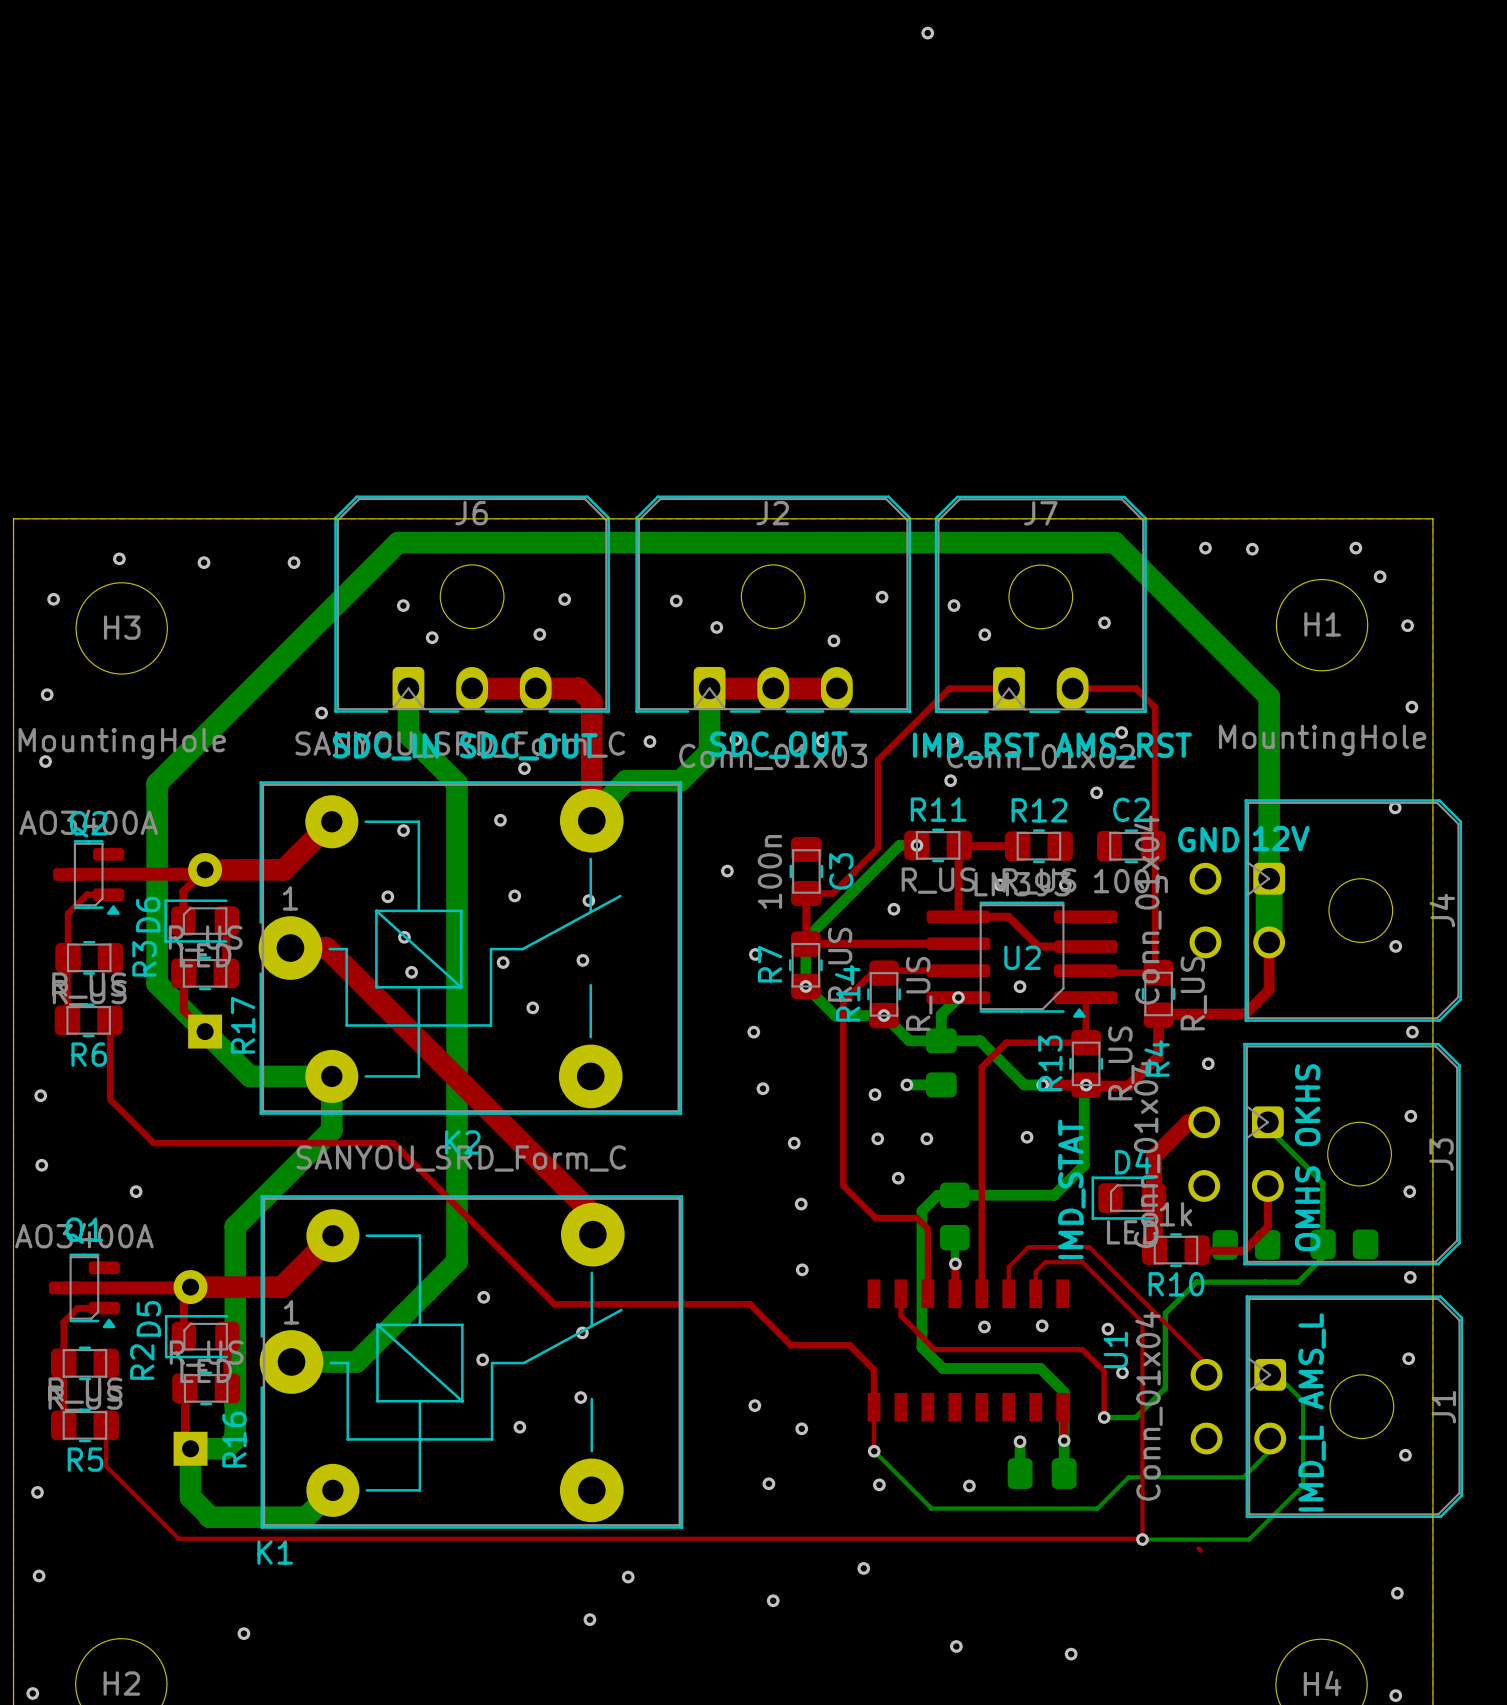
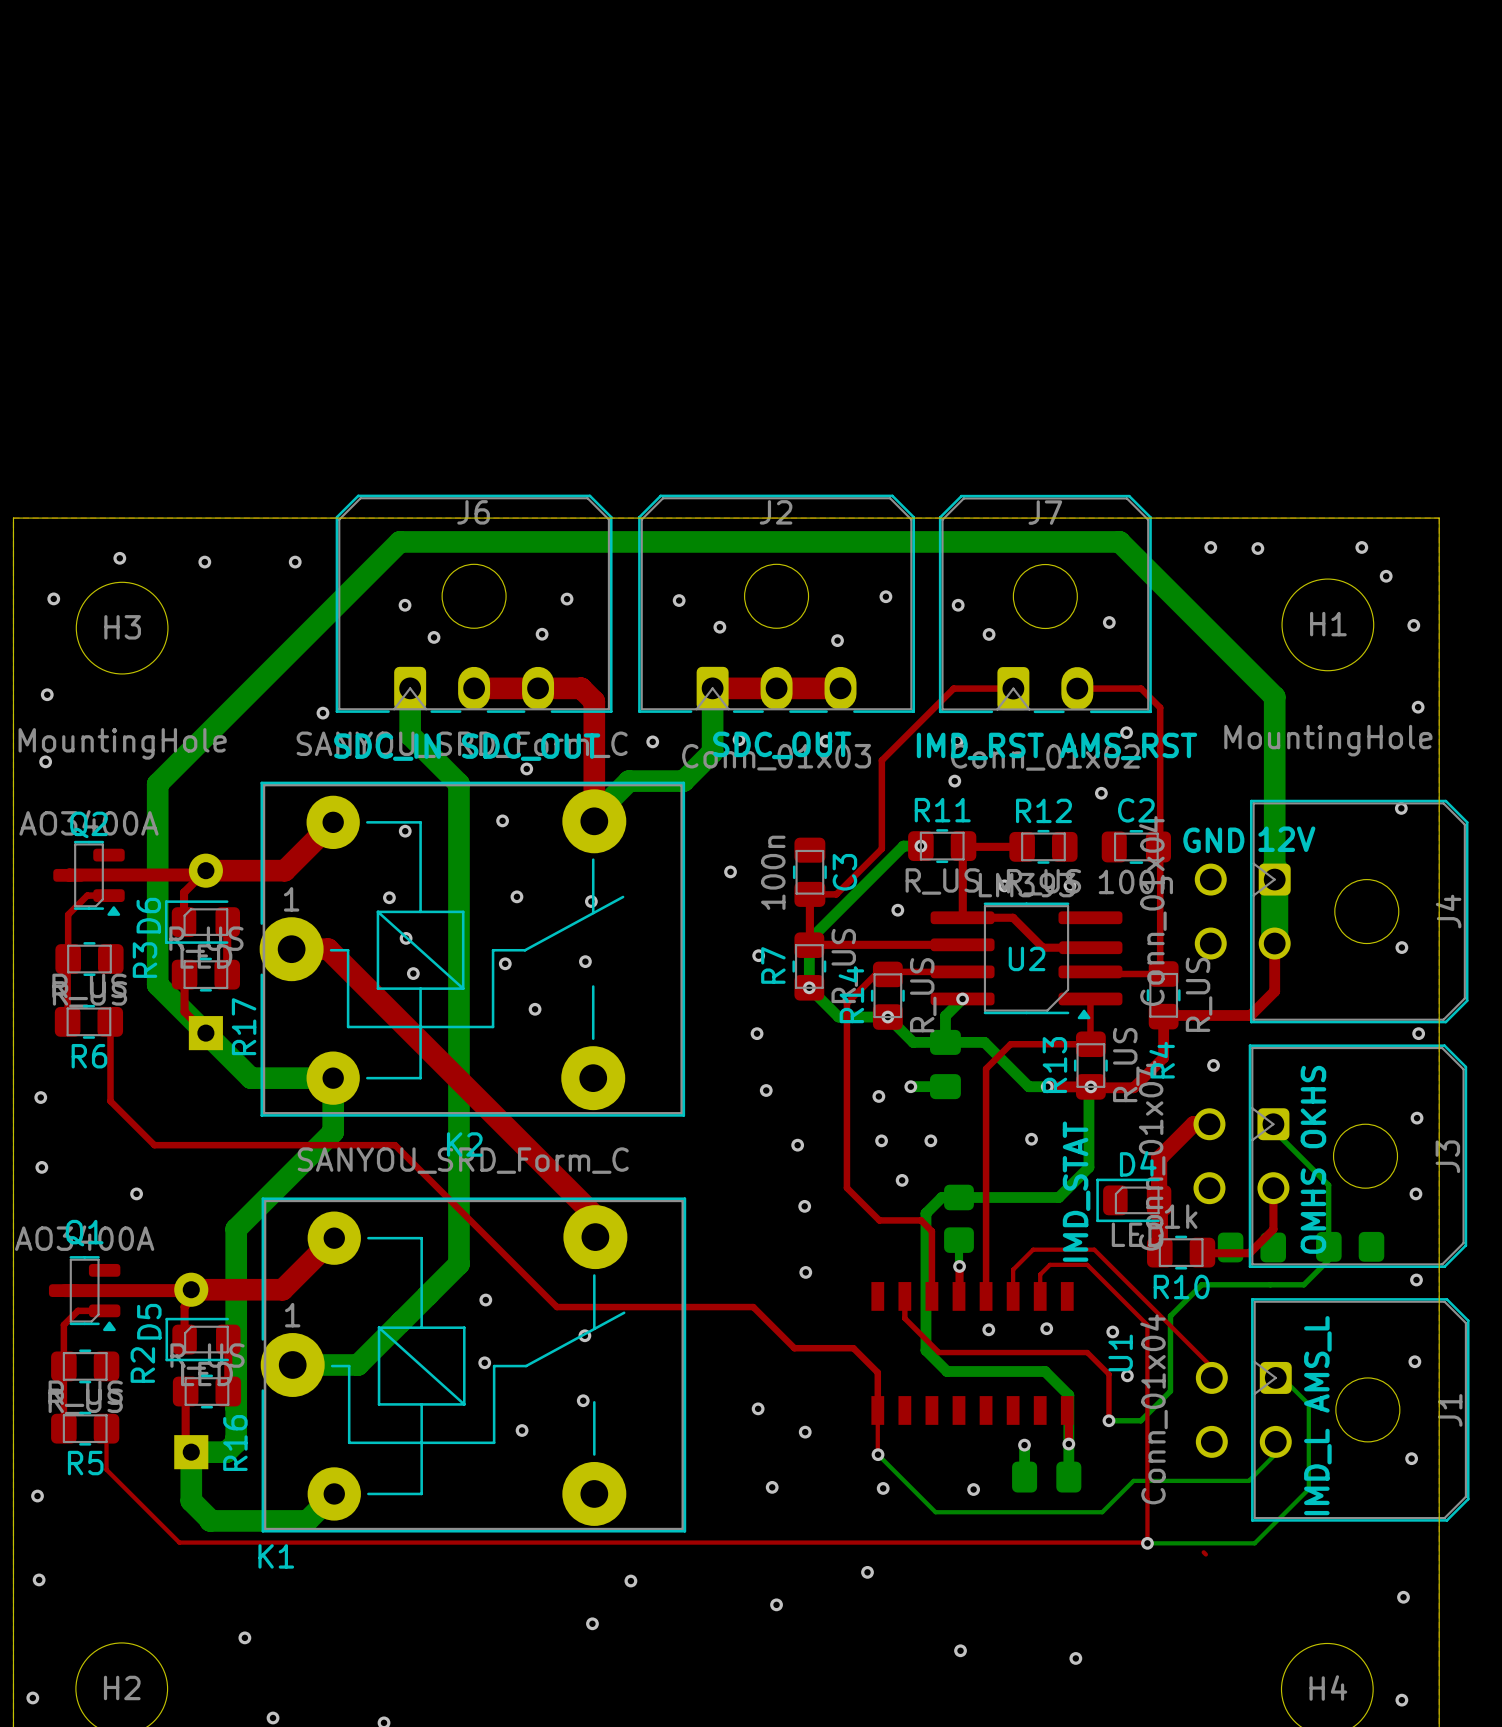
via: (927, 33) -> none
via: (1020, 986) -> none

